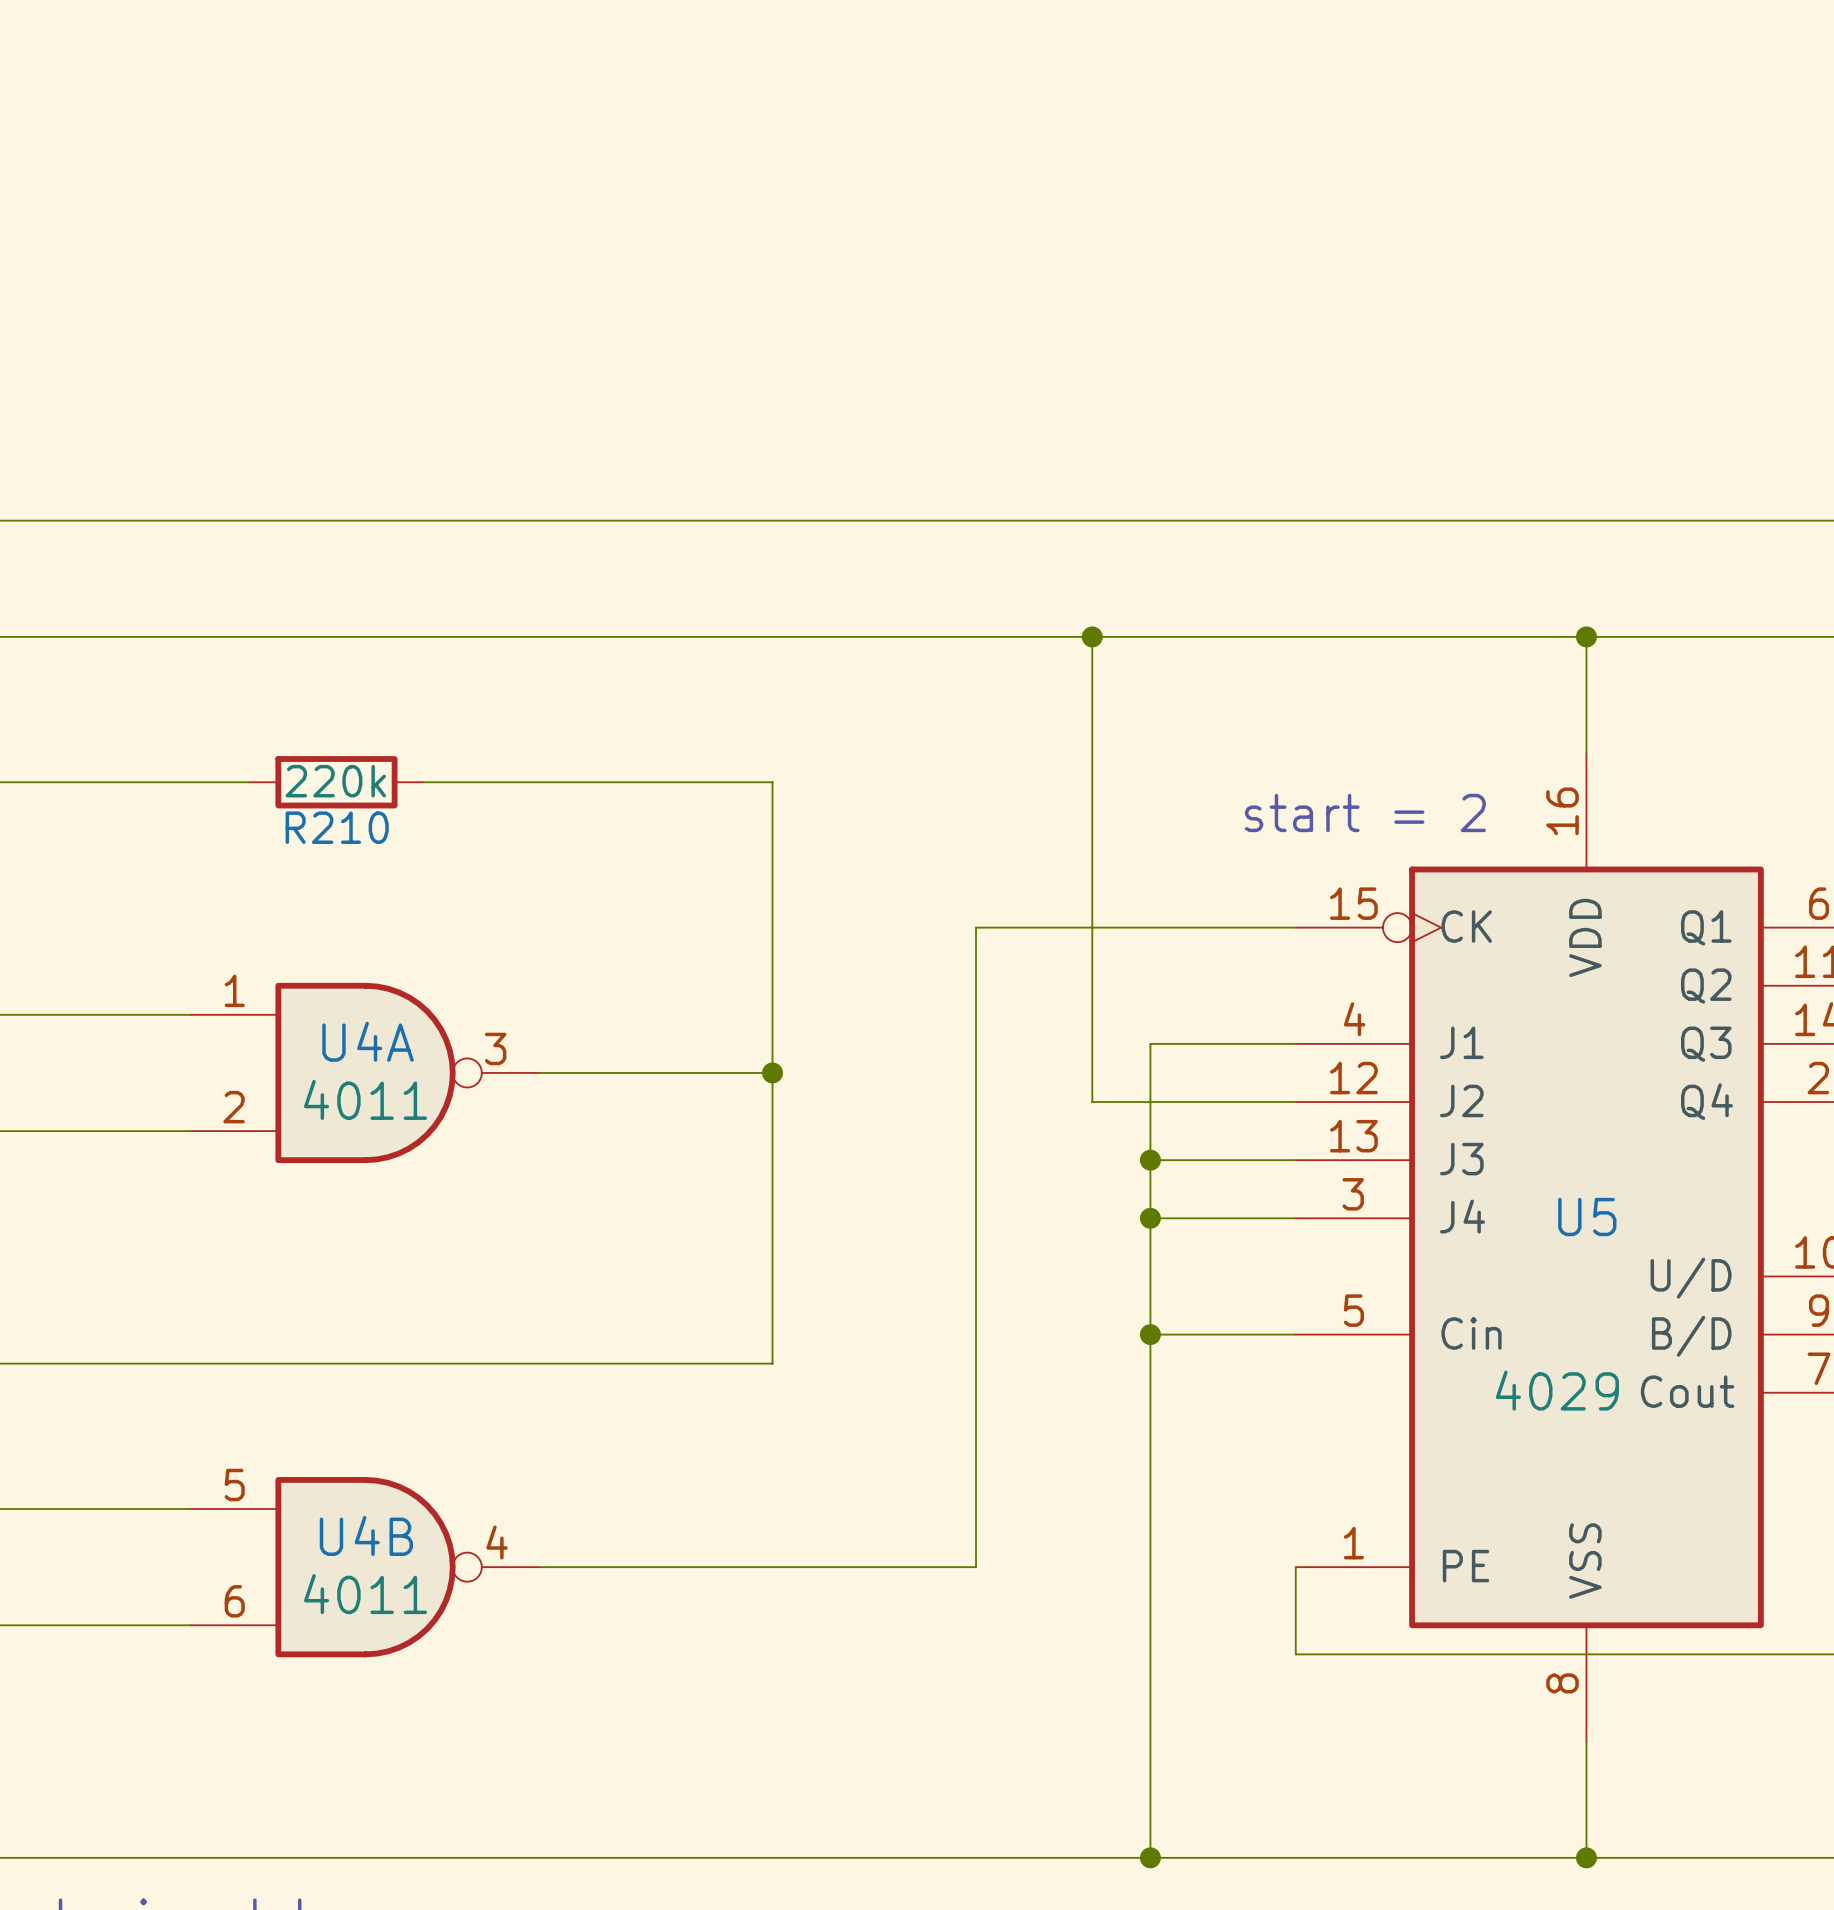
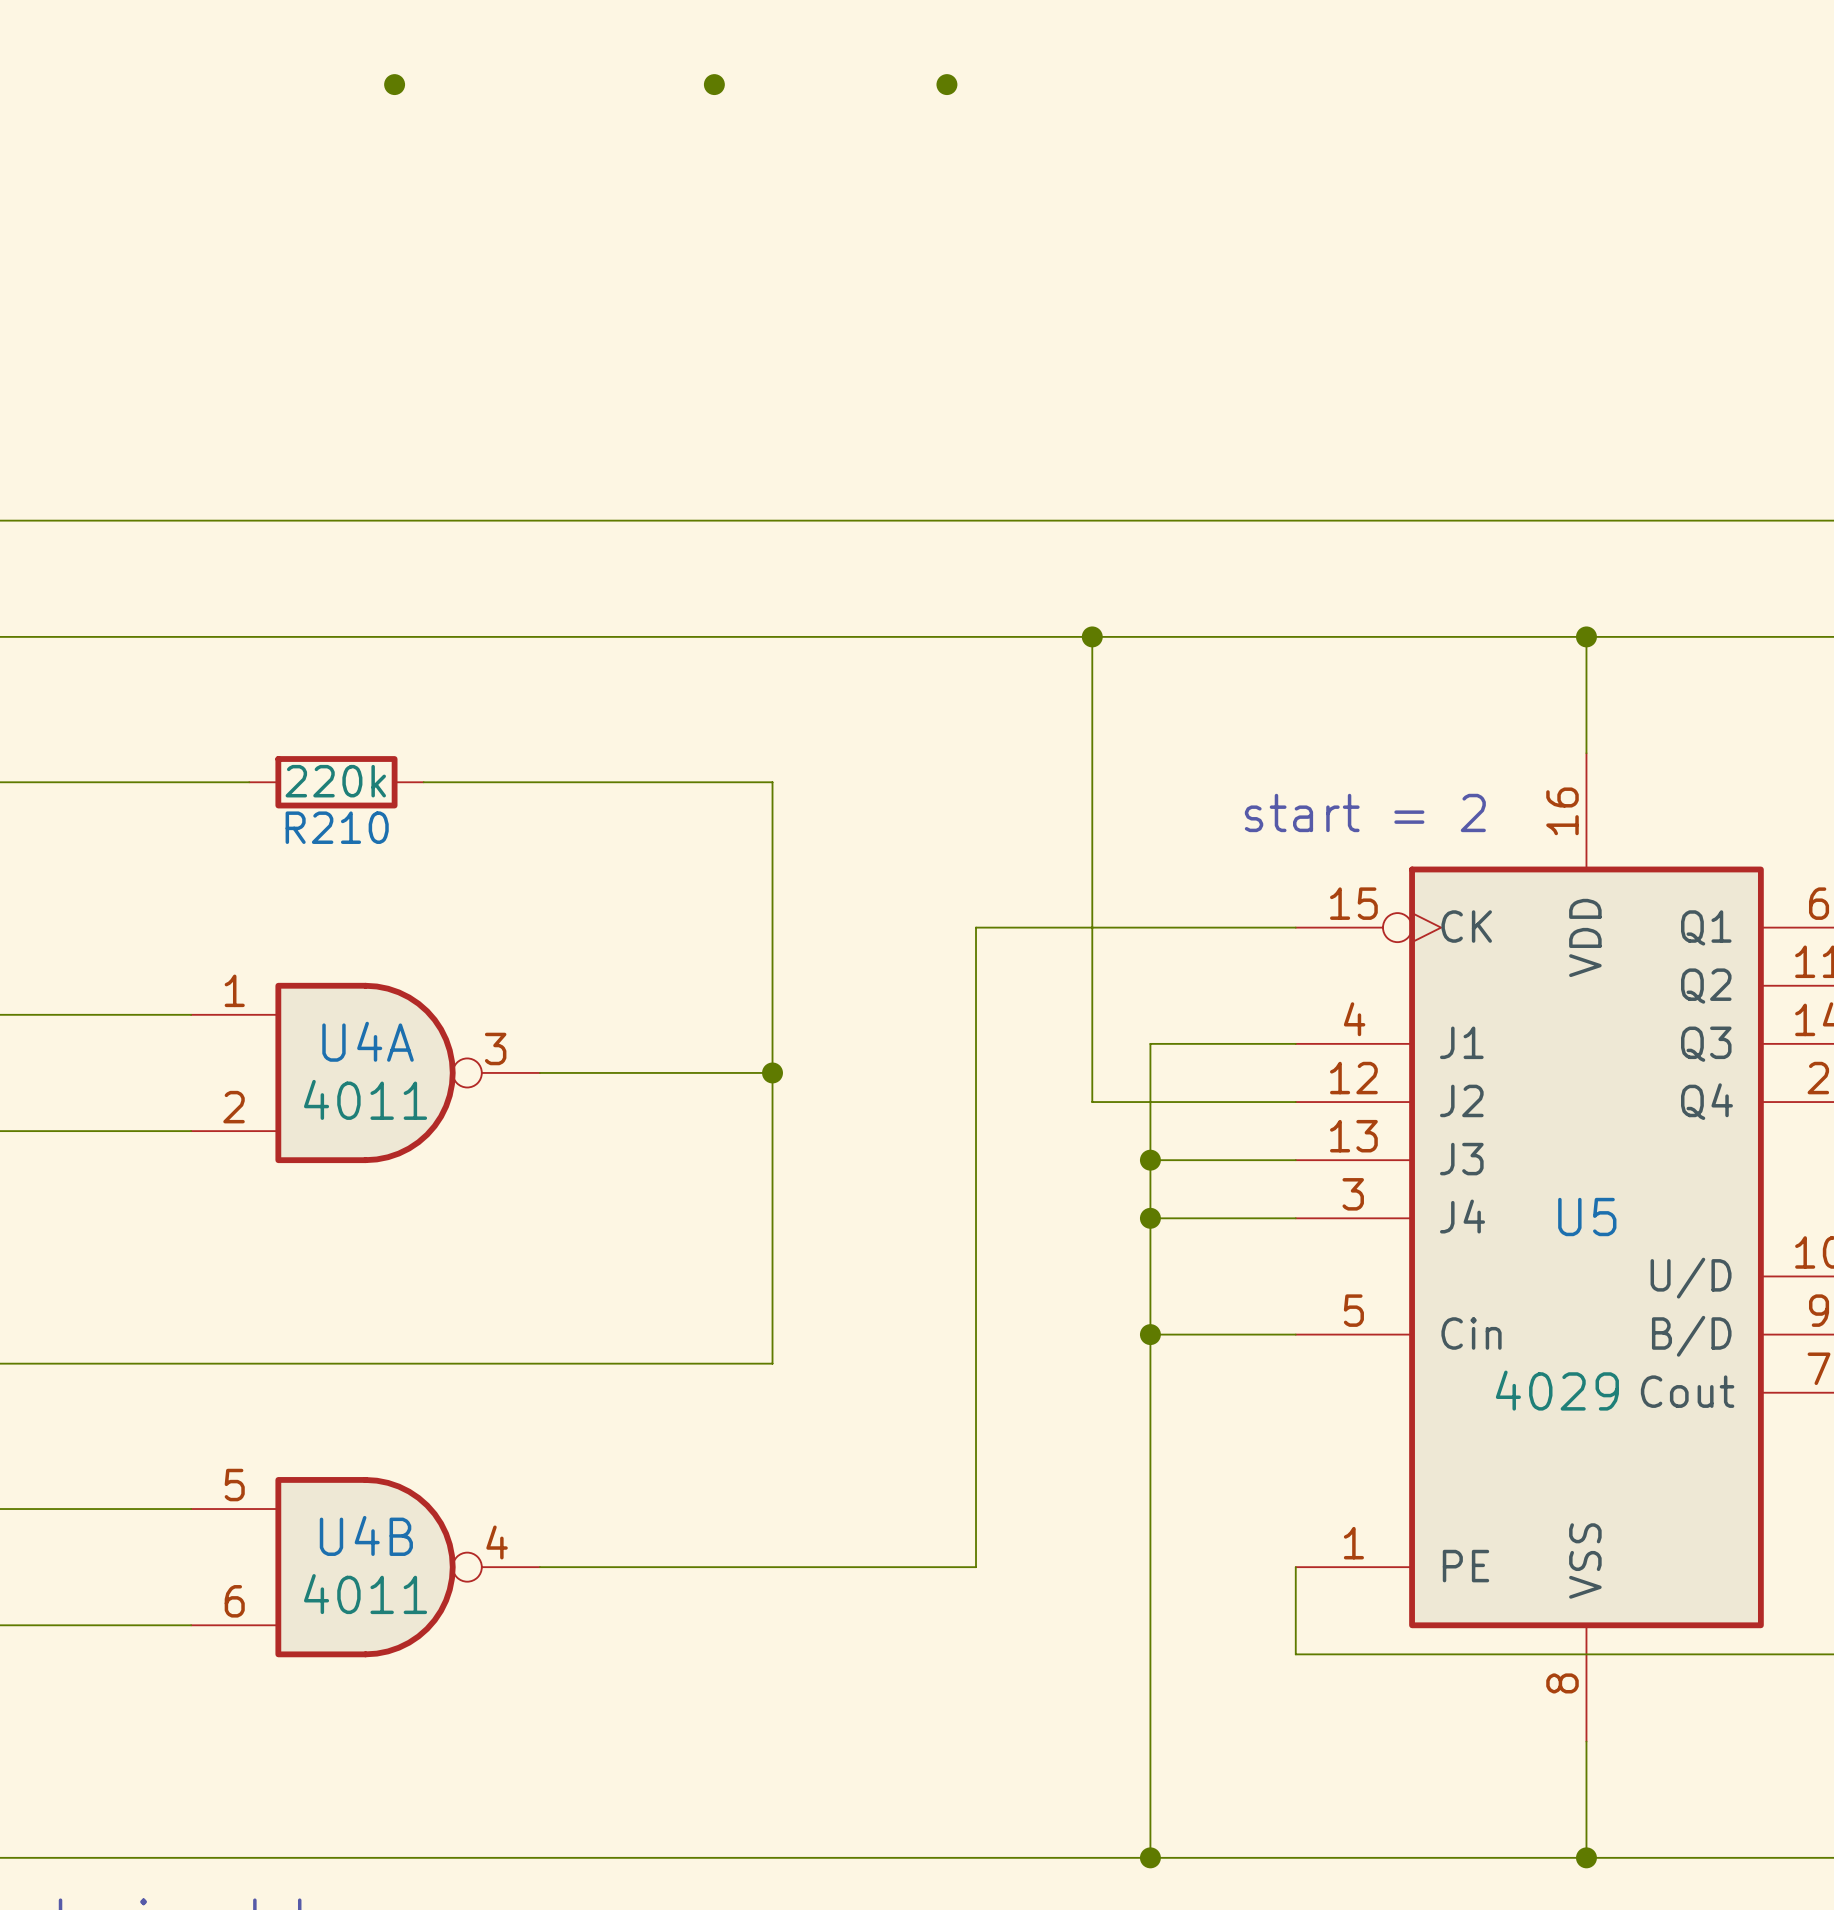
junction: none -> (394, 84)
junction: none -> (714, 84)
junction: none -> (946, 84)

